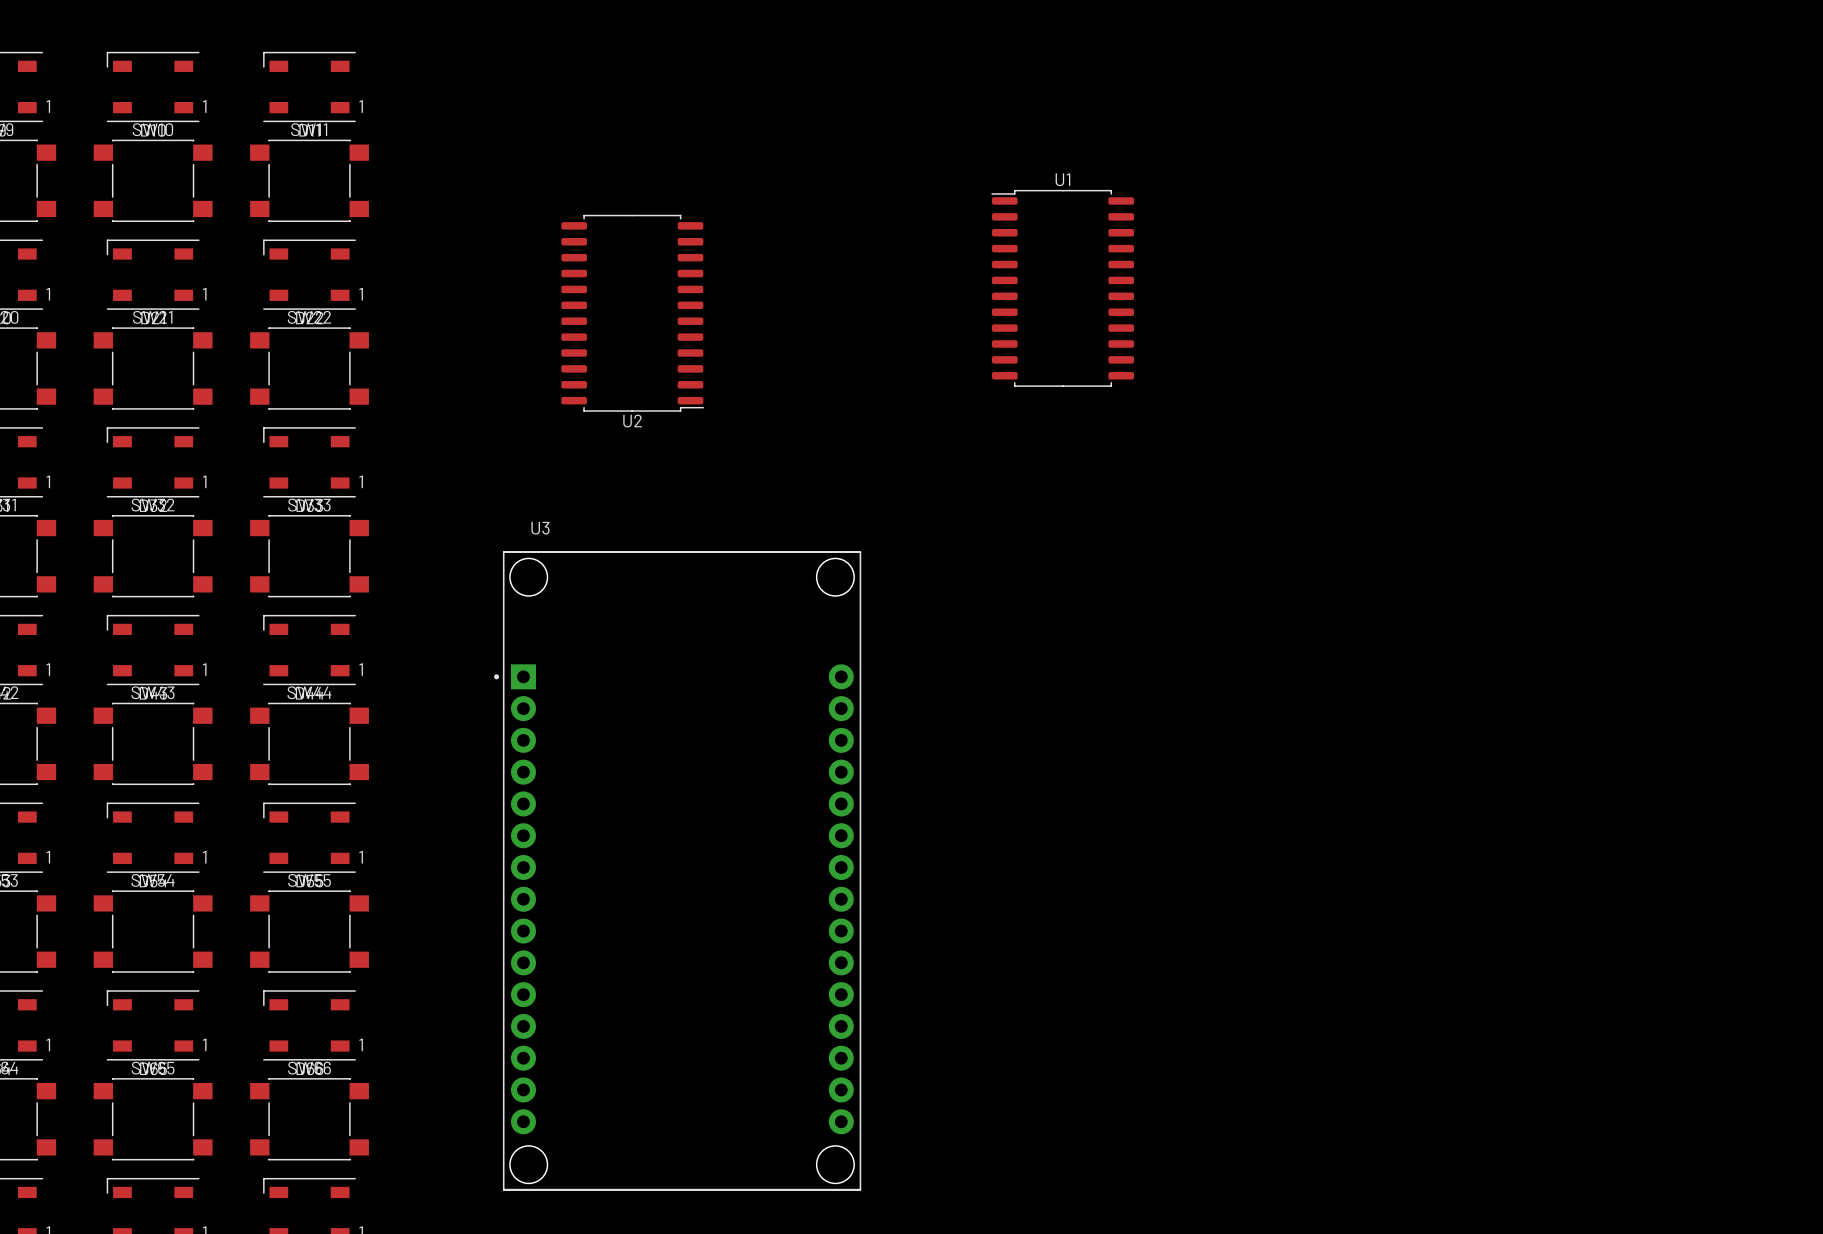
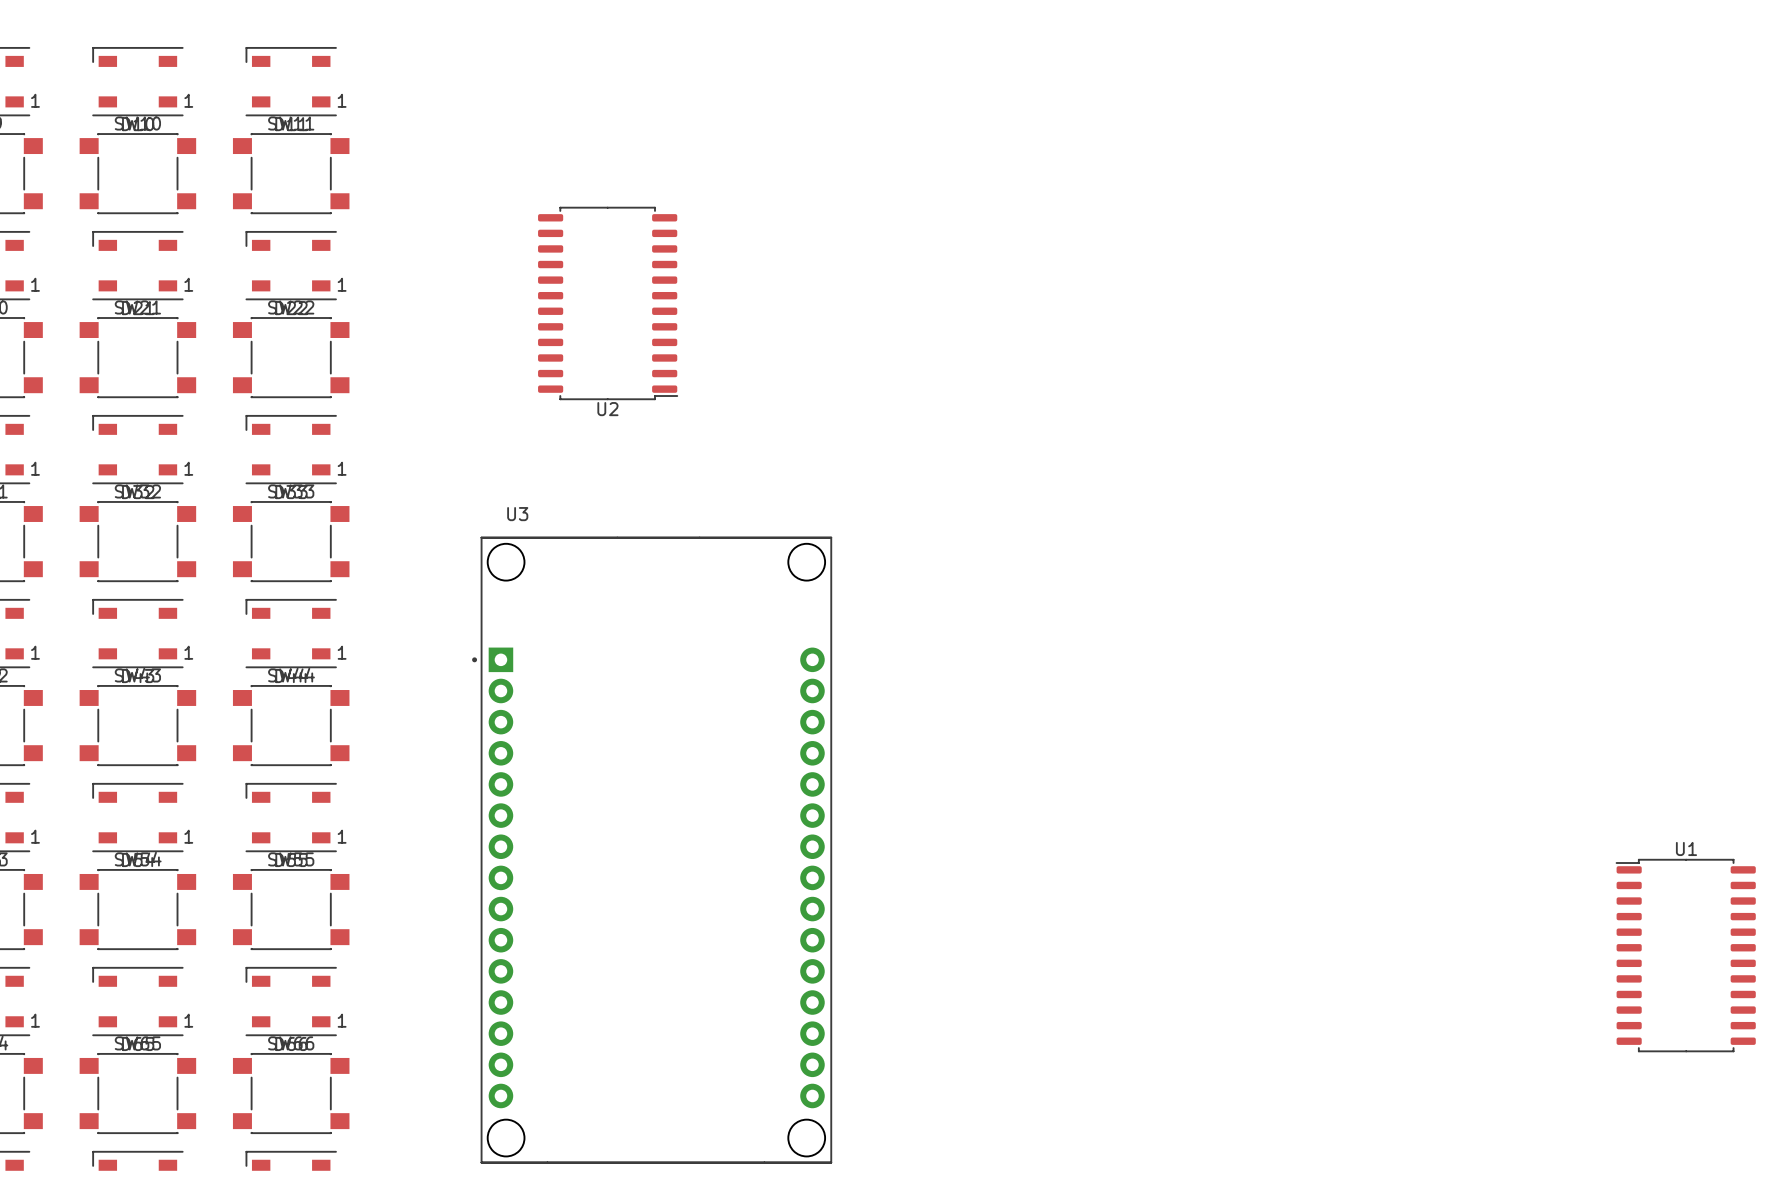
U1 position: (1062, 288) -> (1685, 955)

